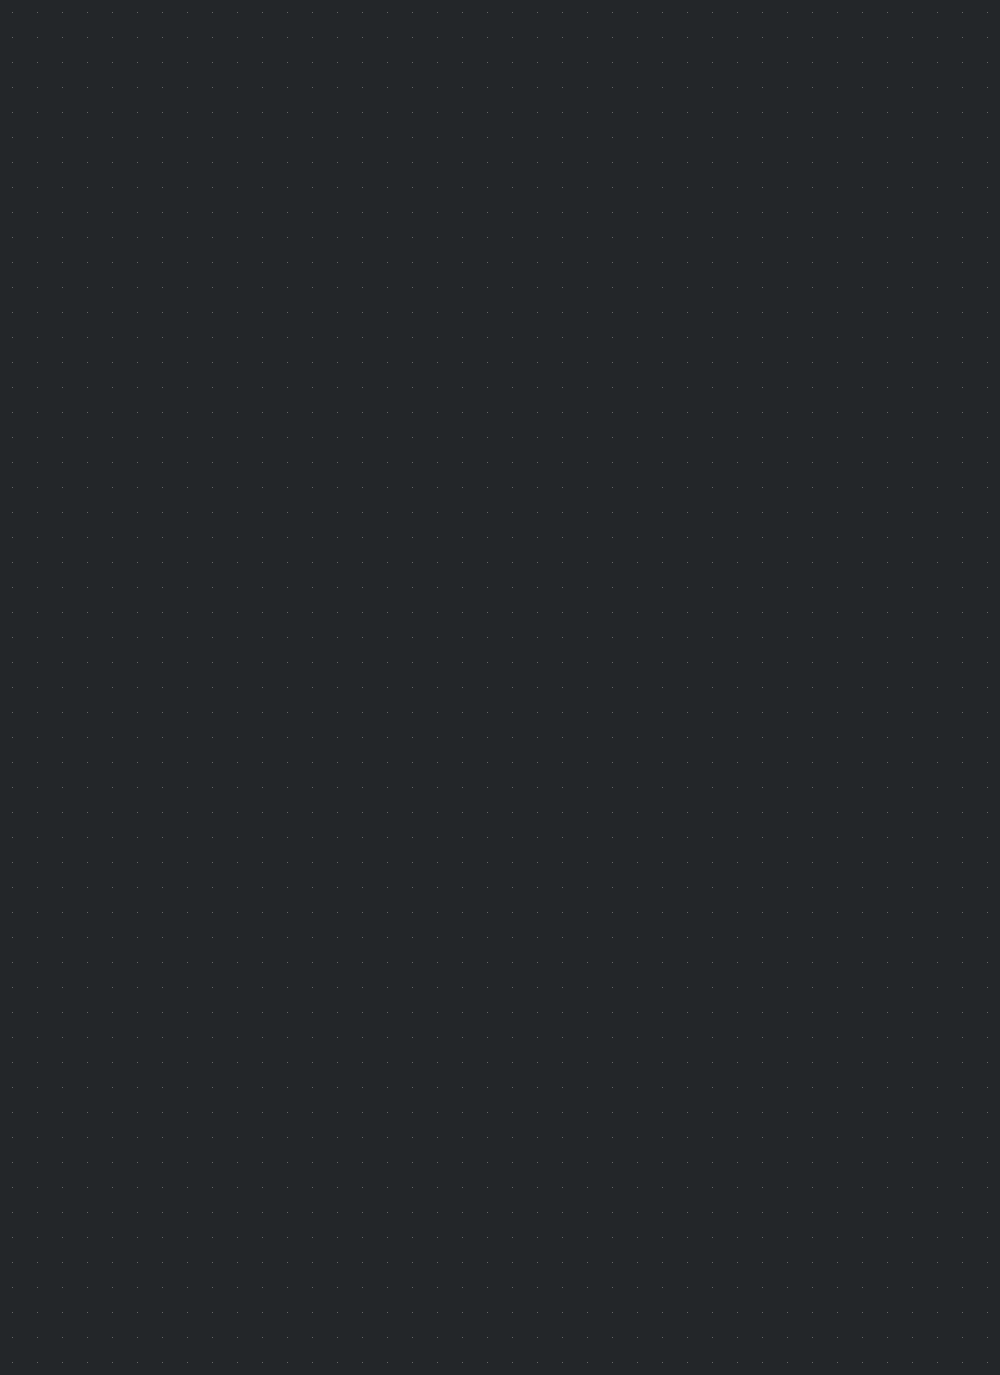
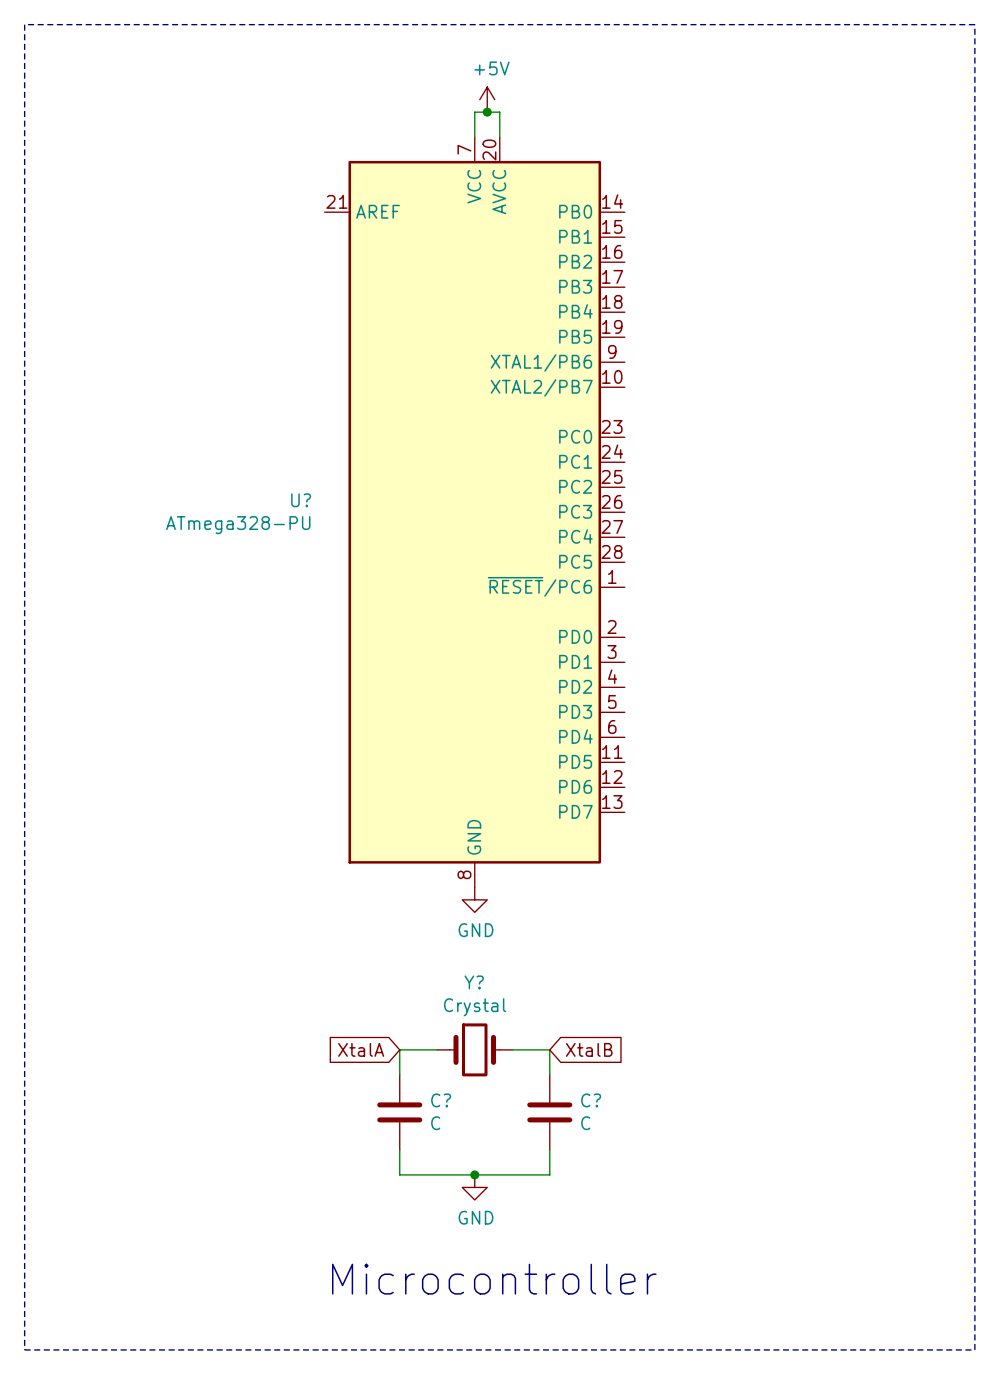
line: none -> (24, 24) (974, 24) (974, 1349) (24, 1349) (24, 24)
power symbol: none -> +5V (487, 99)
junction: none -> (487, 112)
wire: none -> (474, 137) (474, 112) (499, 112) (499, 137)
U?: none -> ATmega328-PU (474, 512)
power symbol: none -> GND (474, 899)
global label: none -> XtalA (361, 1049)
wire: none -> (437, 1049) (399, 1049) (399, 1074)
Y?: none -> Crystal (474, 1049)
wire: none -> (512, 1049) (549, 1049) (549, 1074)
global label: none -> XtalB (589, 1049)
C?: none -> C (399, 1112)
C?: none -> C (549, 1112)
wire: none -> (399, 1149) (399, 1174) (549, 1174) (549, 1149)
junction: none -> (474, 1174)
power symbol: none -> GND (474, 1187)
text: none -> Microcontroller (494, 1279)

